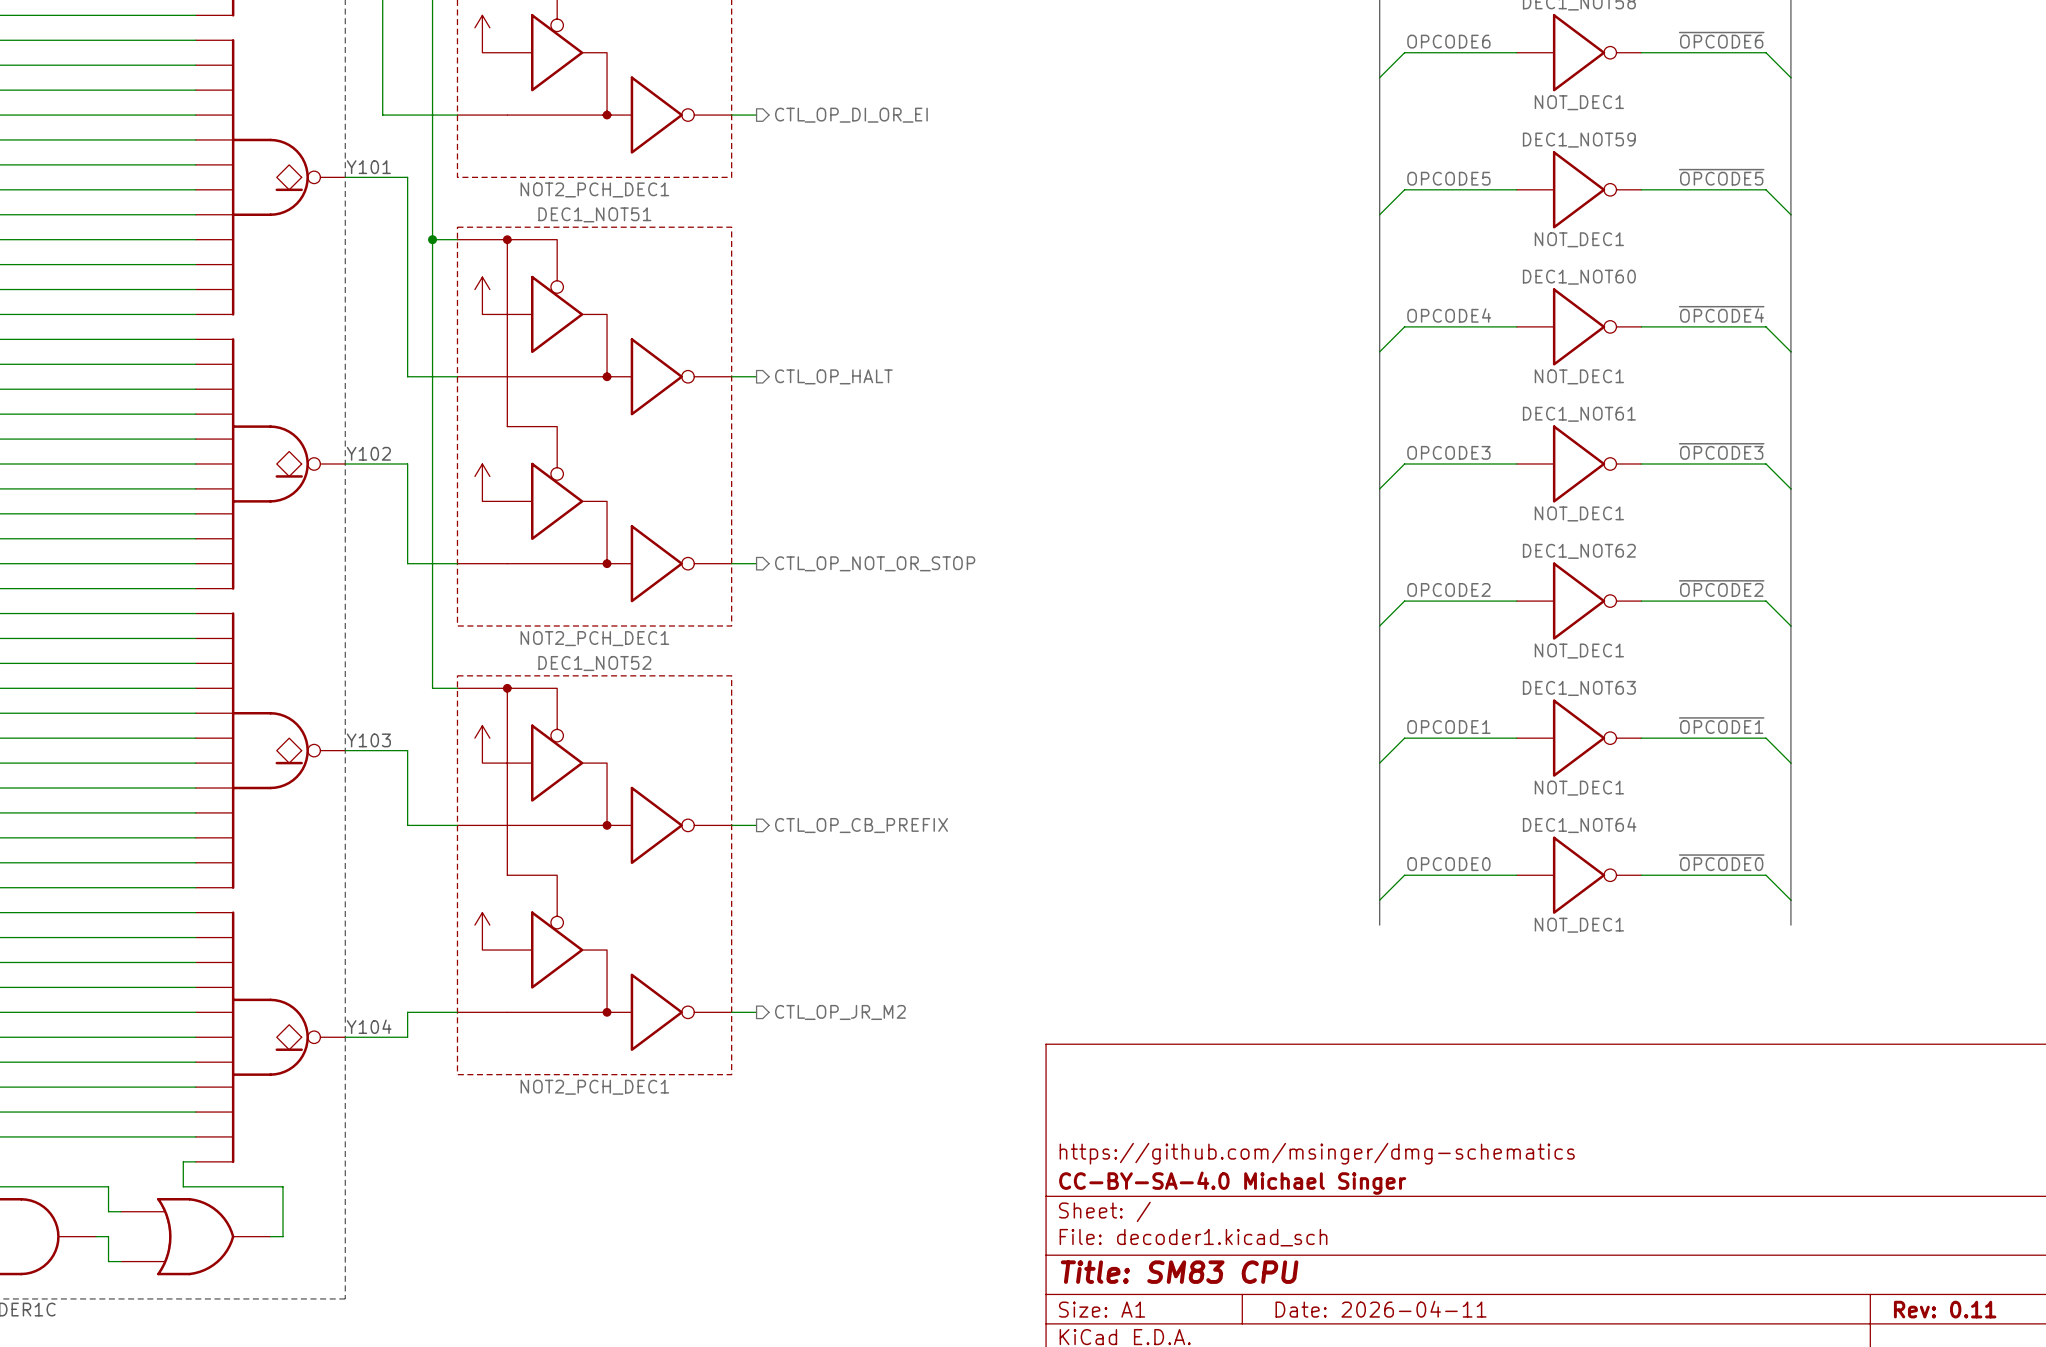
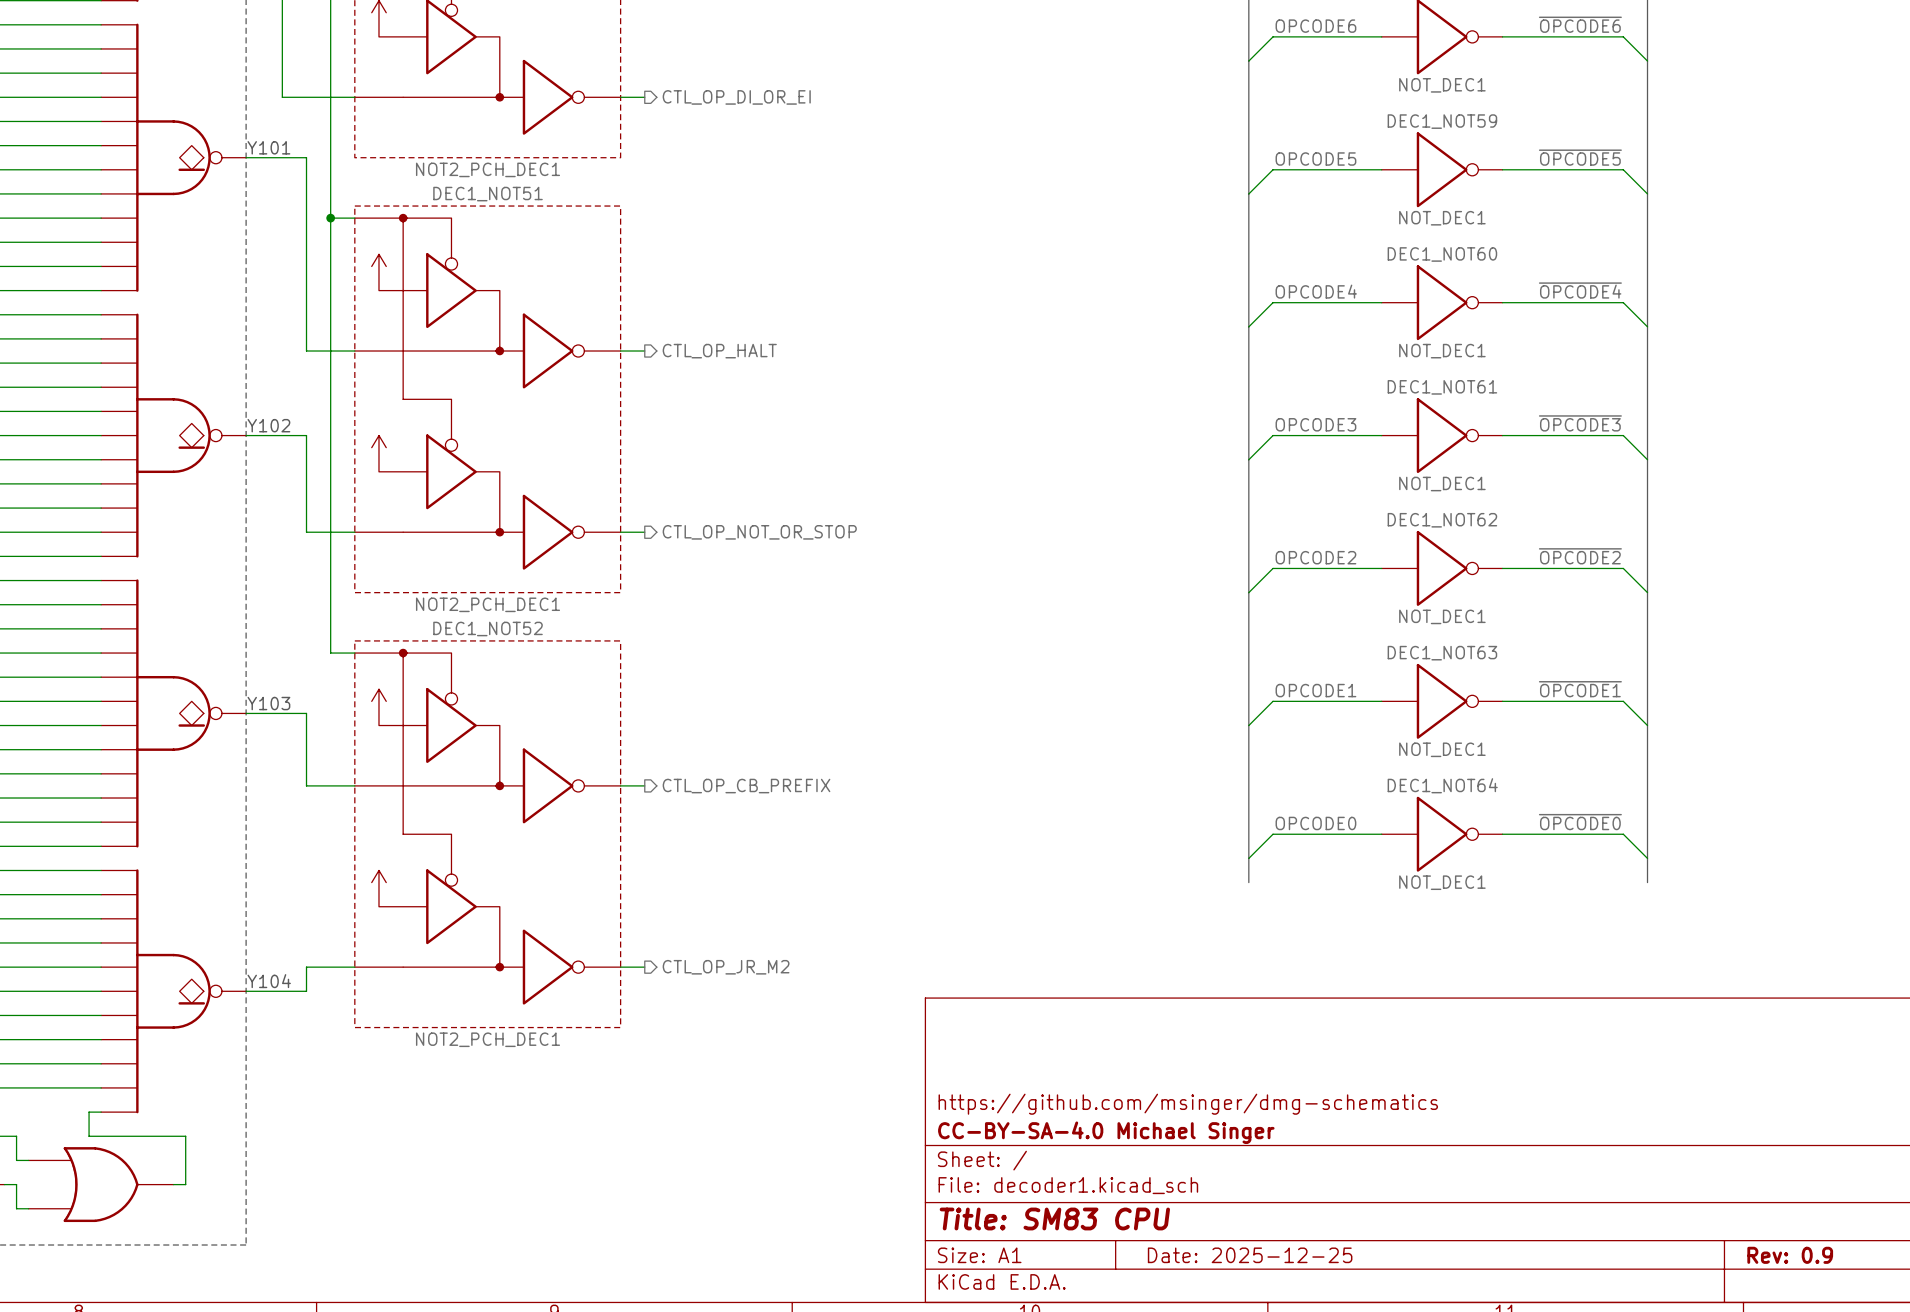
title block: Date: 2026-04-11 (1381, 1309) -> Date: 2025-12-25 (1250, 1255)
title block: Rev: 0.11 (1945, 1309) -> Rev: 0.9 (1790, 1255)

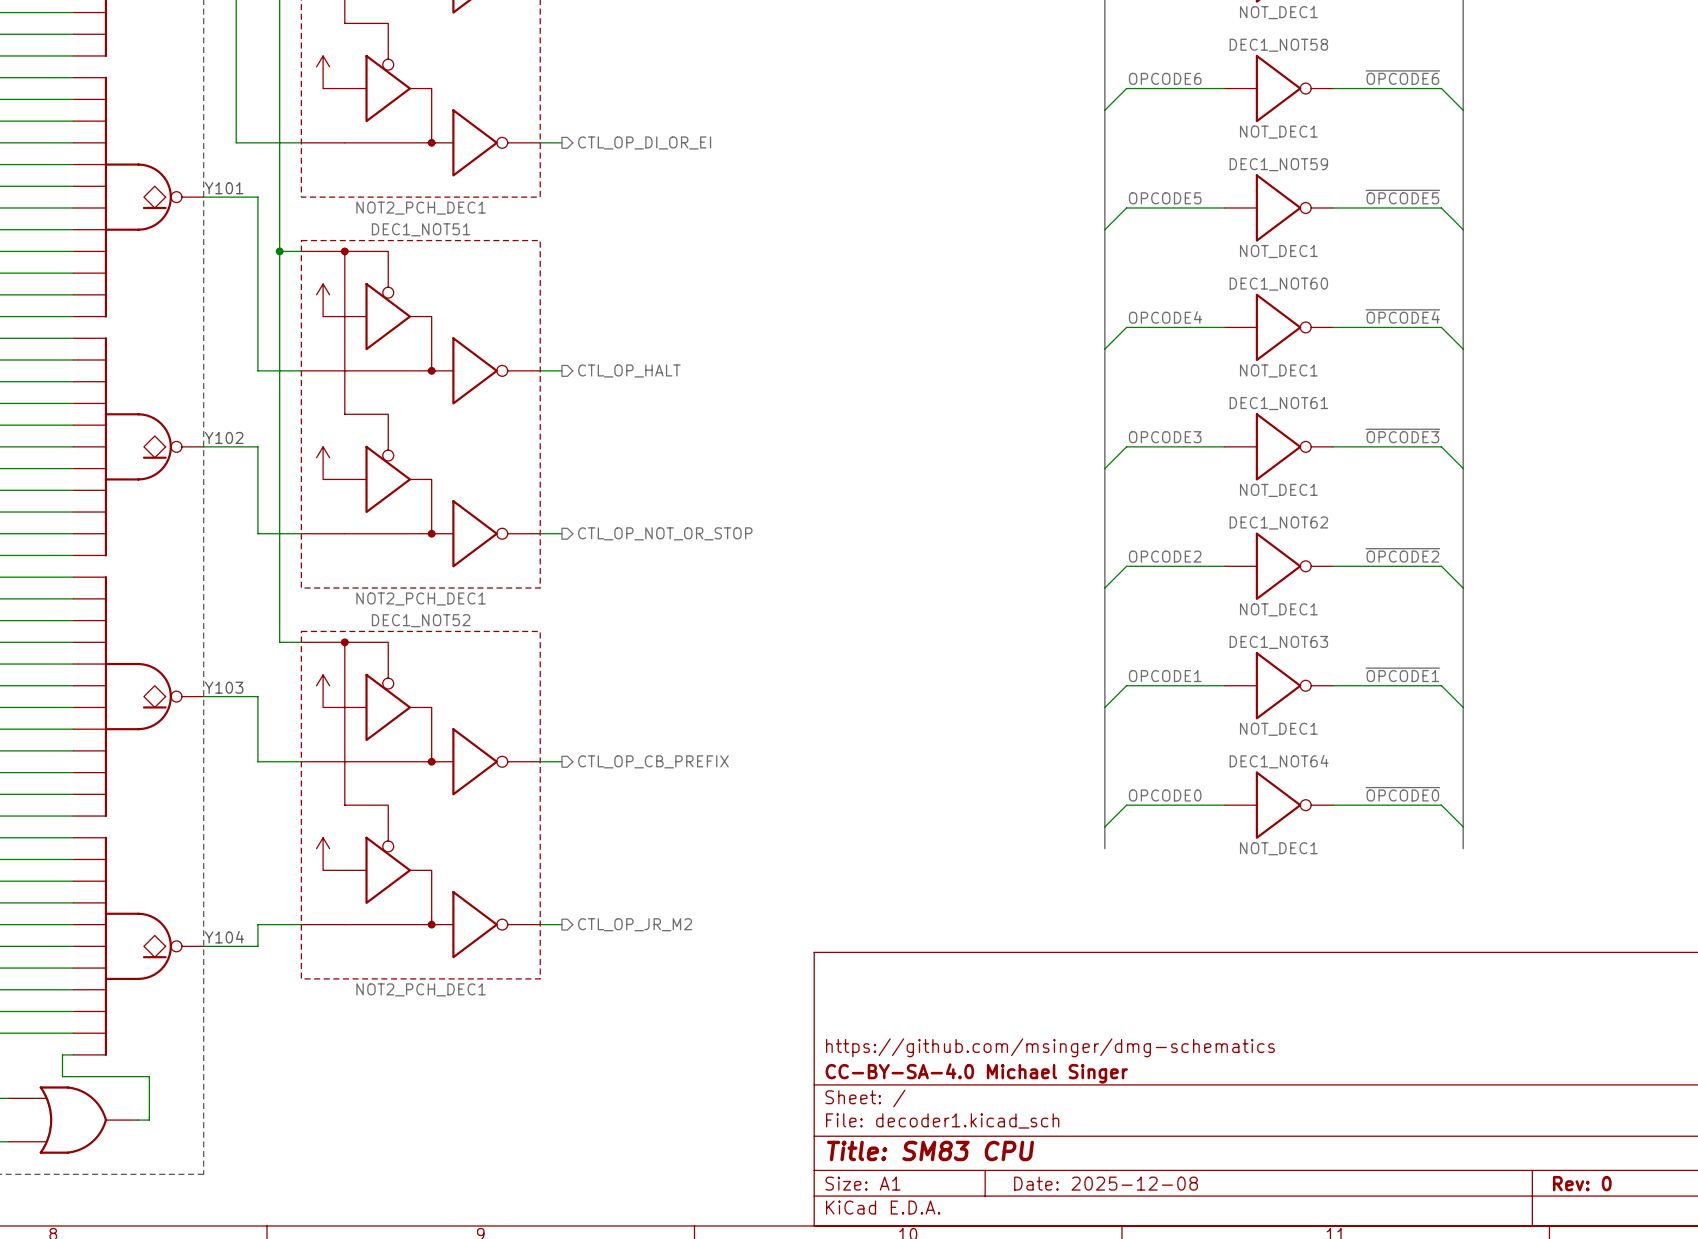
title block: Date: 2025-12-25 (1250, 1255) -> Date: 2025-12-08 (1106, 1183)
title block: Rev: 0.9 (1790, 1255) -> Rev: 0 (1582, 1183)

